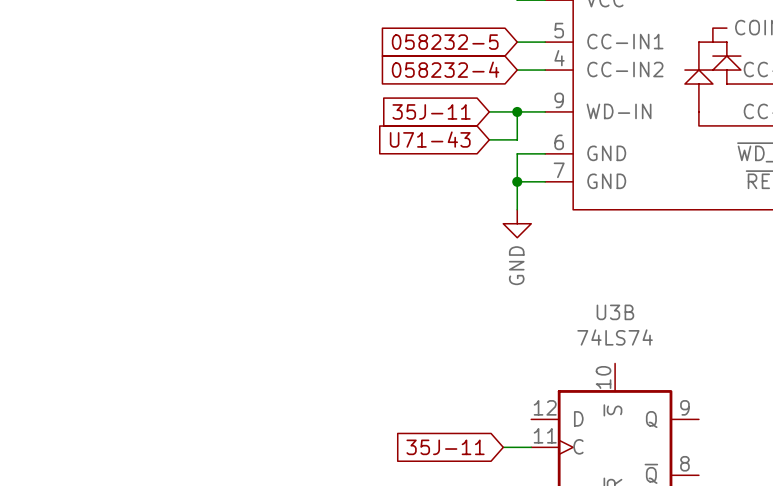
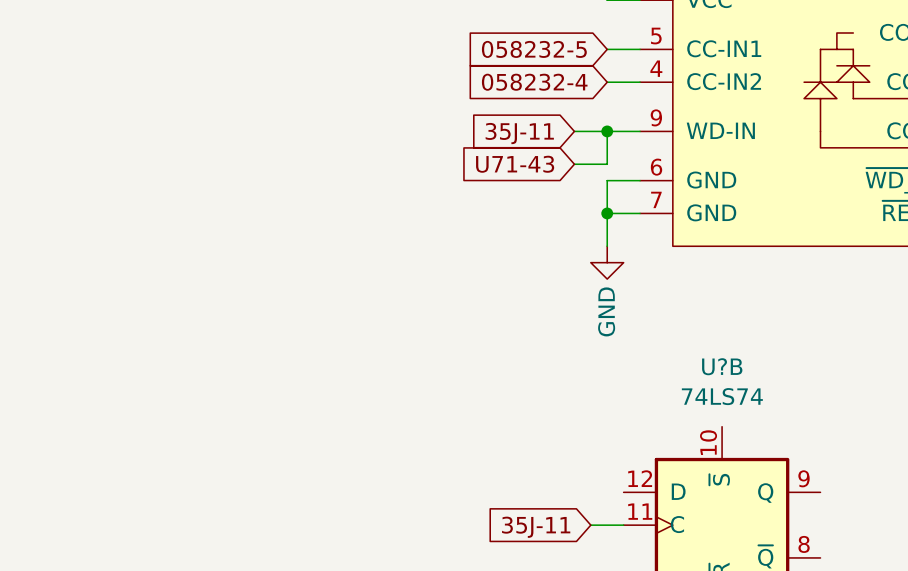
U3B name: U3B (615, 312) -> U?B (722, 366)

